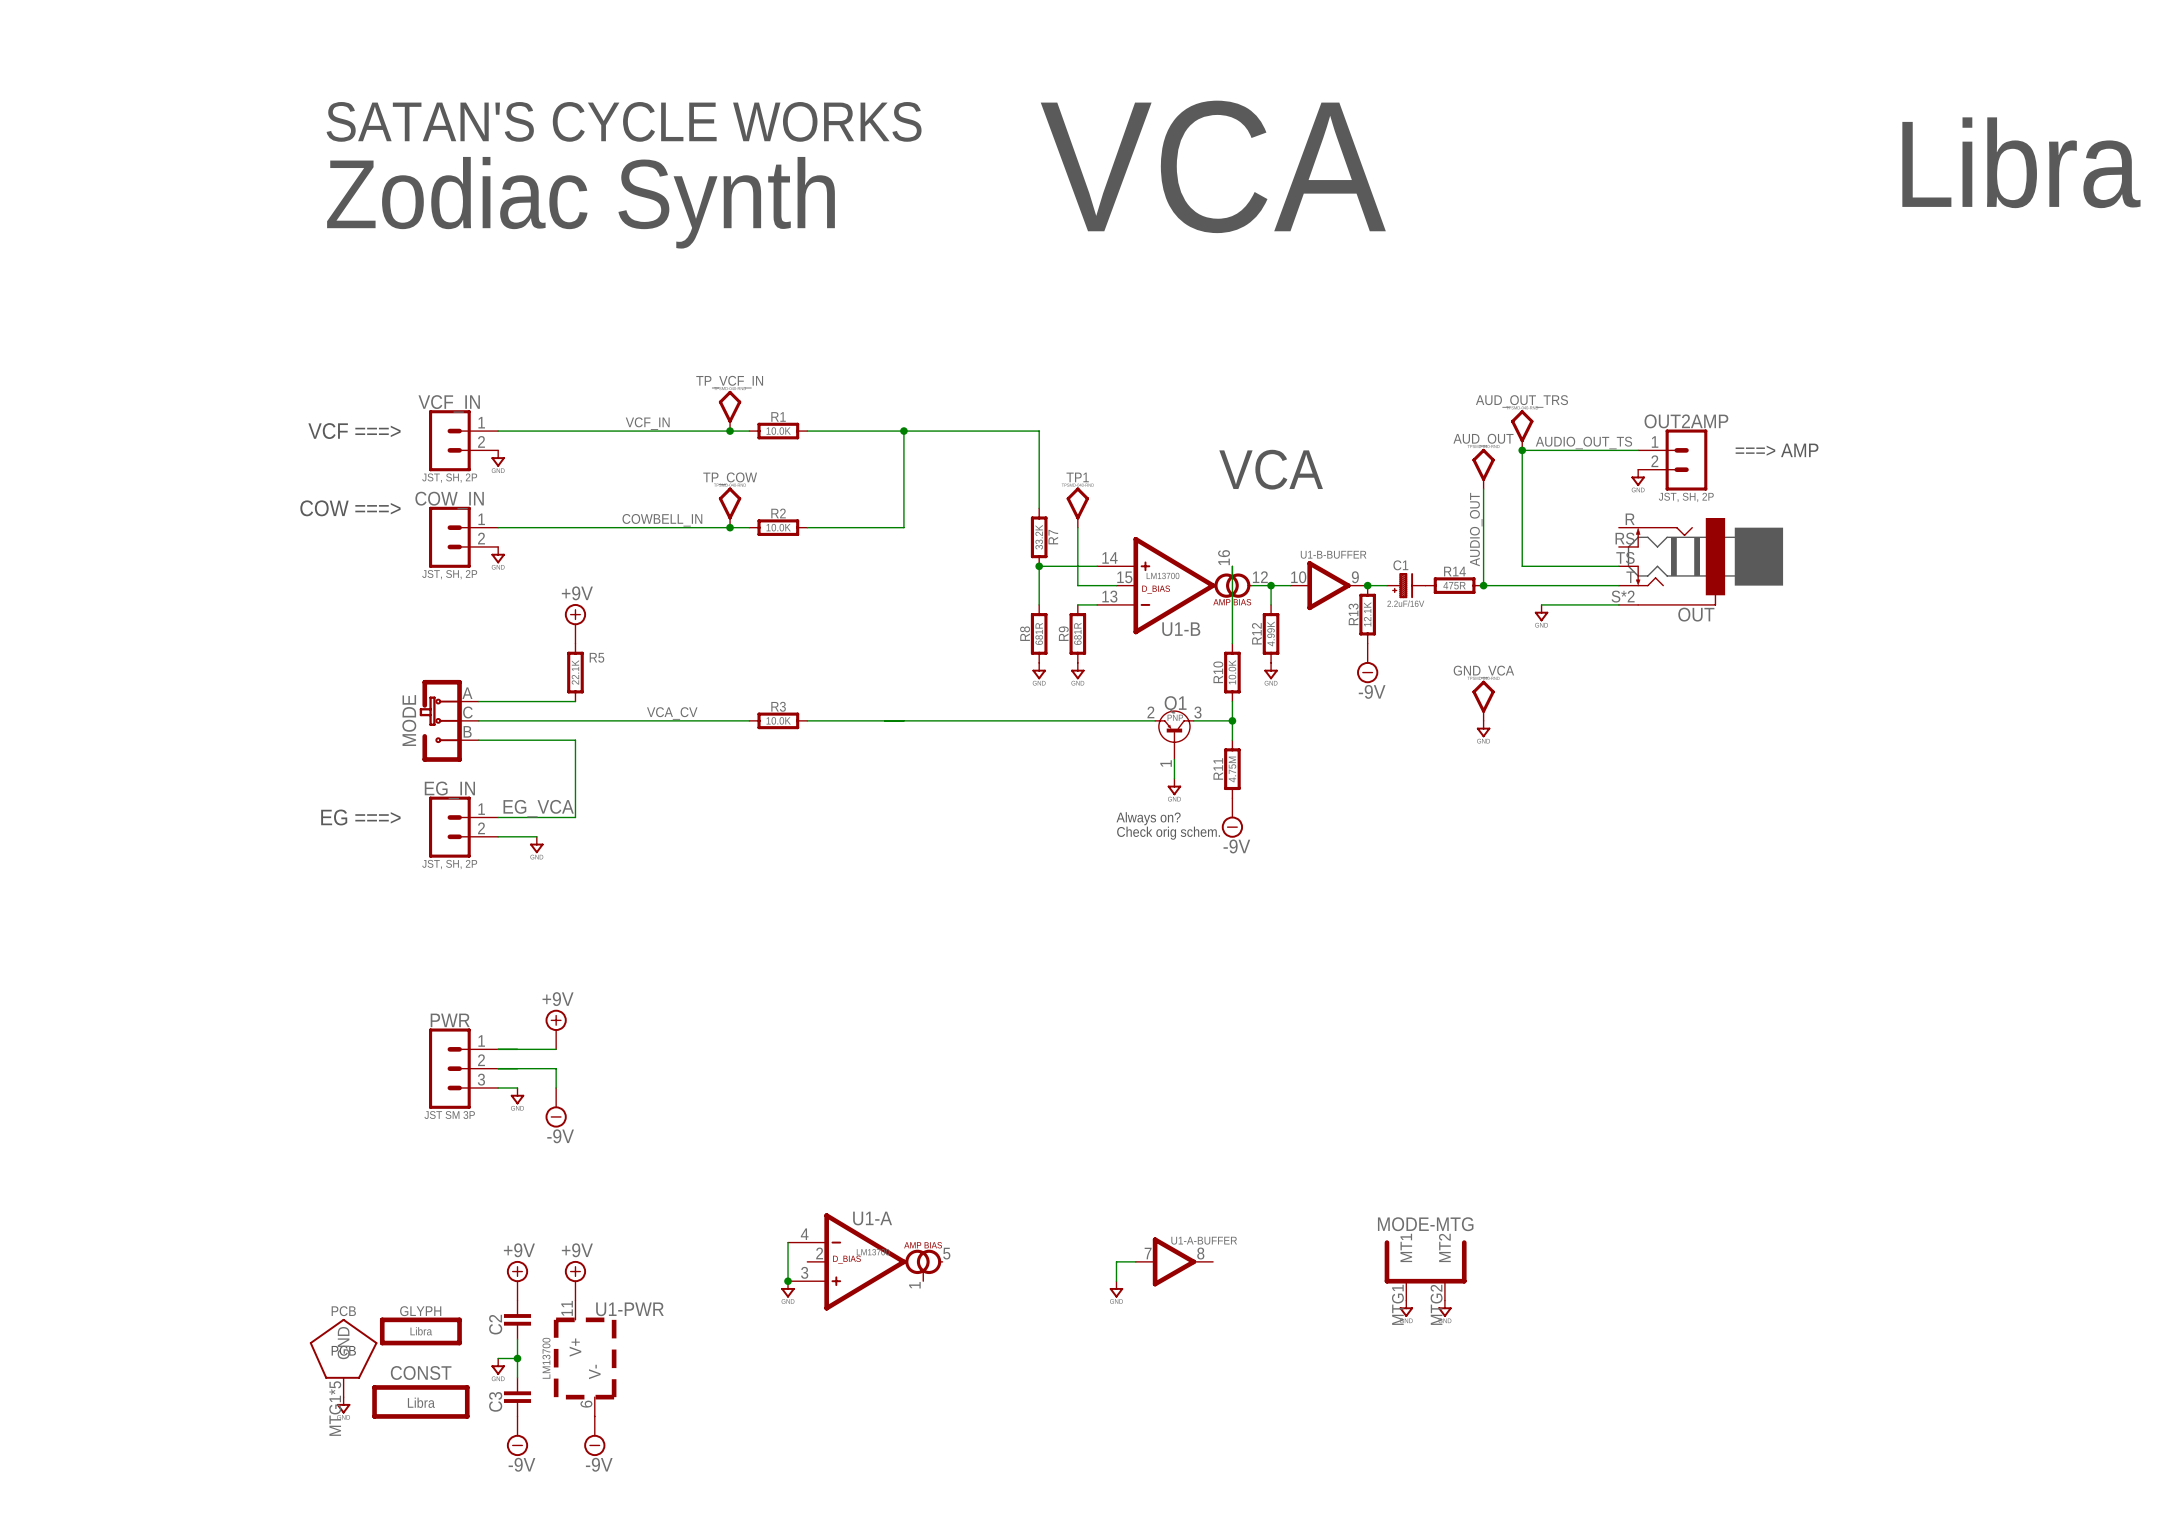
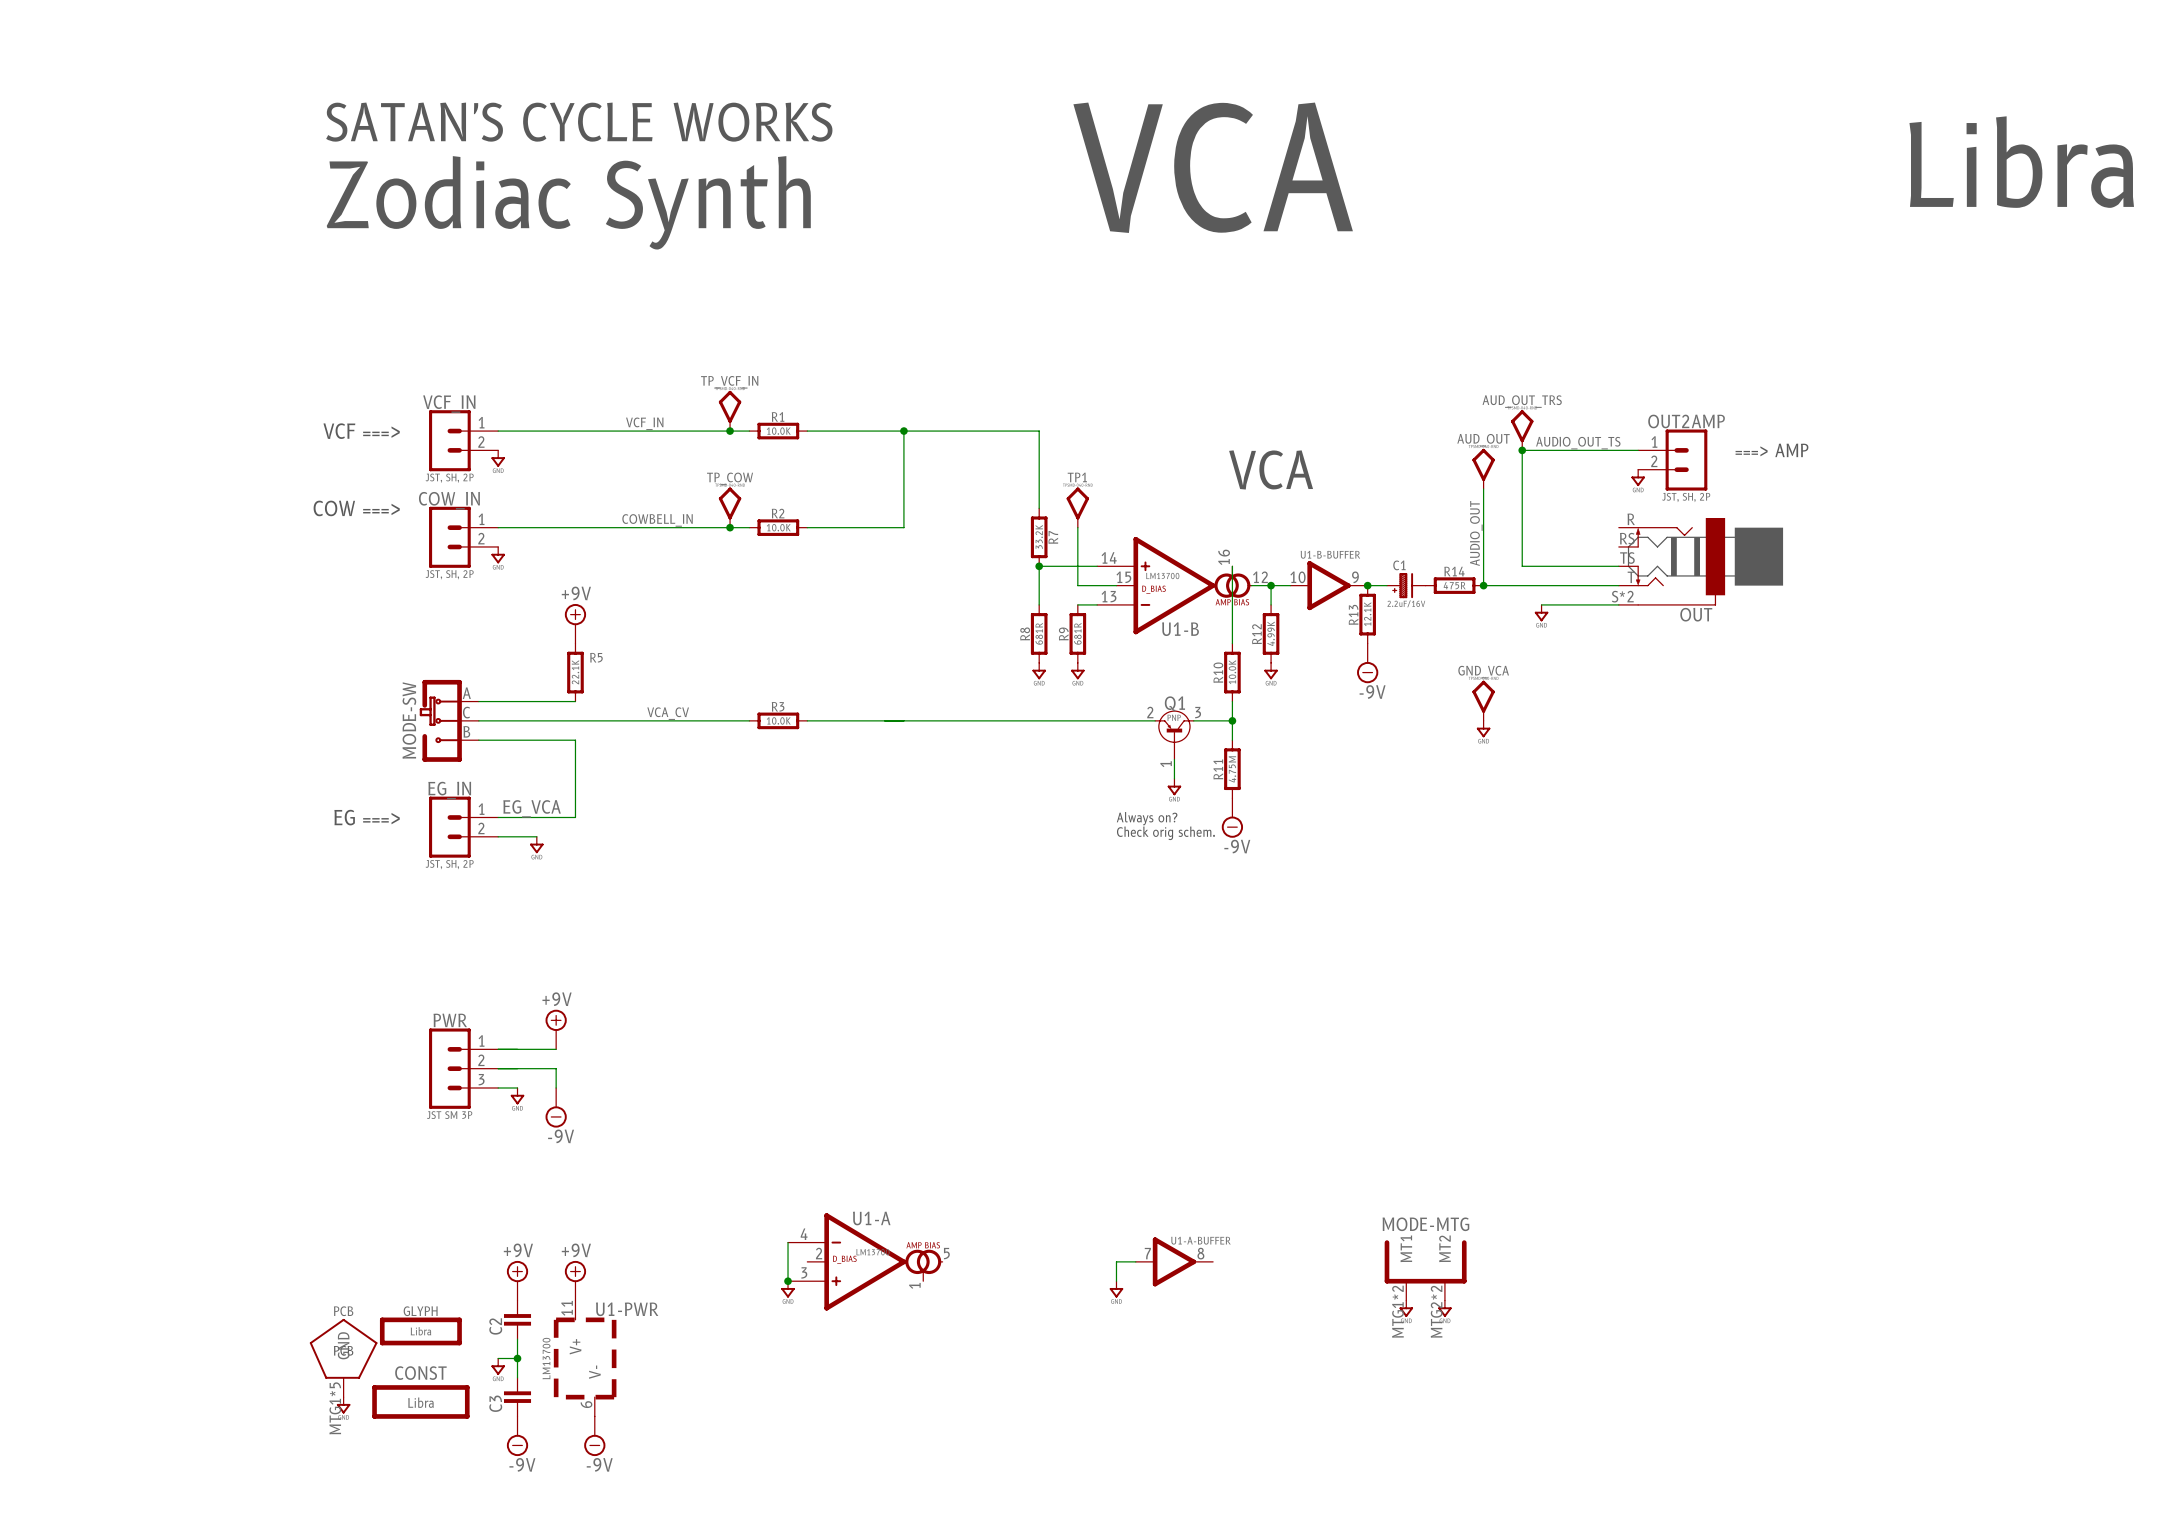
MODE name: MODE (409, 720) -> MODE-SW (409, 720)
MODE-MTG pin number: MTG1 (1397, 1304) -> MTG1*2 (1398, 1311)
MODE-MTG pin number: MTG2 (1436, 1304) -> MTG2*2 (1436, 1311)

